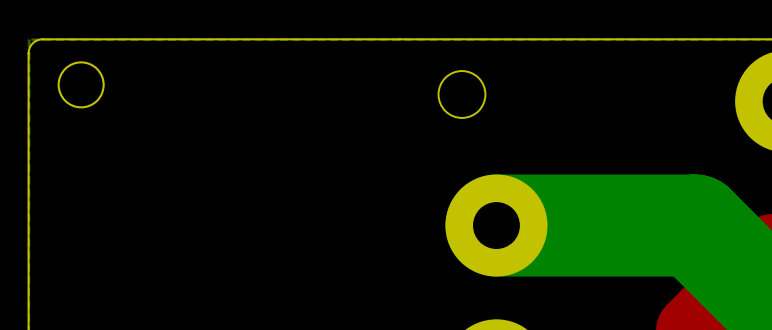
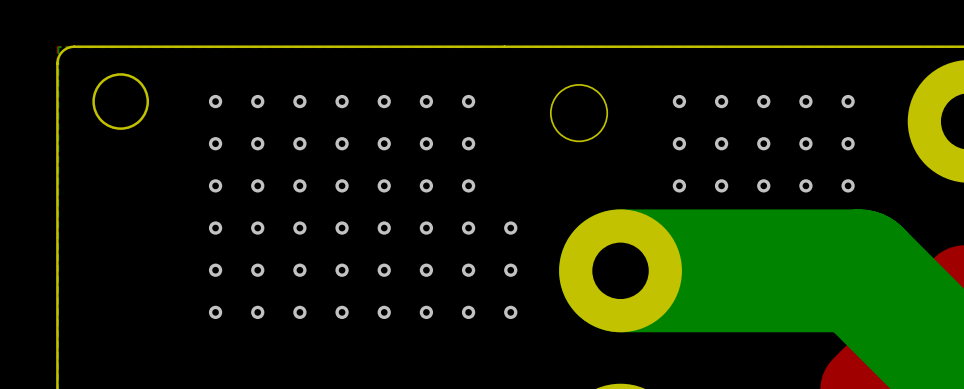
via: none -> (215, 101)
via: none -> (257, 101)
via: none -> (299, 101)
via: none -> (342, 101)
via: none -> (384, 101)
via: none -> (426, 101)
via: none -> (468, 101)
via: none -> (679, 101)
via: none -> (721, 101)
via: none -> (763, 101)
via: none -> (805, 101)
via: none -> (848, 101)
via: none -> (215, 143)
via: none -> (257, 143)
via: none -> (299, 143)
via: none -> (342, 143)
via: none -> (384, 143)
via: none -> (426, 143)
via: none -> (468, 143)
via: none -> (679, 143)
via: none -> (721, 143)
via: none -> (763, 143)
via: none -> (805, 143)
via: none -> (848, 143)
via: none -> (215, 185)
via: none -> (257, 185)
via: none -> (299, 185)
via: none -> (342, 185)
via: none -> (384, 185)
via: none -> (426, 185)
via: none -> (468, 185)
via: none -> (679, 185)
via: none -> (721, 185)
via: none -> (763, 185)
via: none -> (805, 185)
via: none -> (848, 185)
via: none -> (215, 228)
via: none -> (257, 228)
via: none -> (299, 228)
via: none -> (342, 228)
via: none -> (384, 228)
via: none -> (426, 228)
via: none -> (468, 228)
via: none -> (510, 228)
via: none -> (215, 270)
via: none -> (257, 270)
via: none -> (299, 270)
via: none -> (342, 270)
via: none -> (384, 270)
via: none -> (426, 270)
via: none -> (468, 270)
via: none -> (510, 270)
via: none -> (215, 312)
via: none -> (257, 312)
via: none -> (299, 312)
via: none -> (342, 312)
via: none -> (384, 312)
via: none -> (426, 312)
via: none -> (468, 312)
via: none -> (510, 312)

